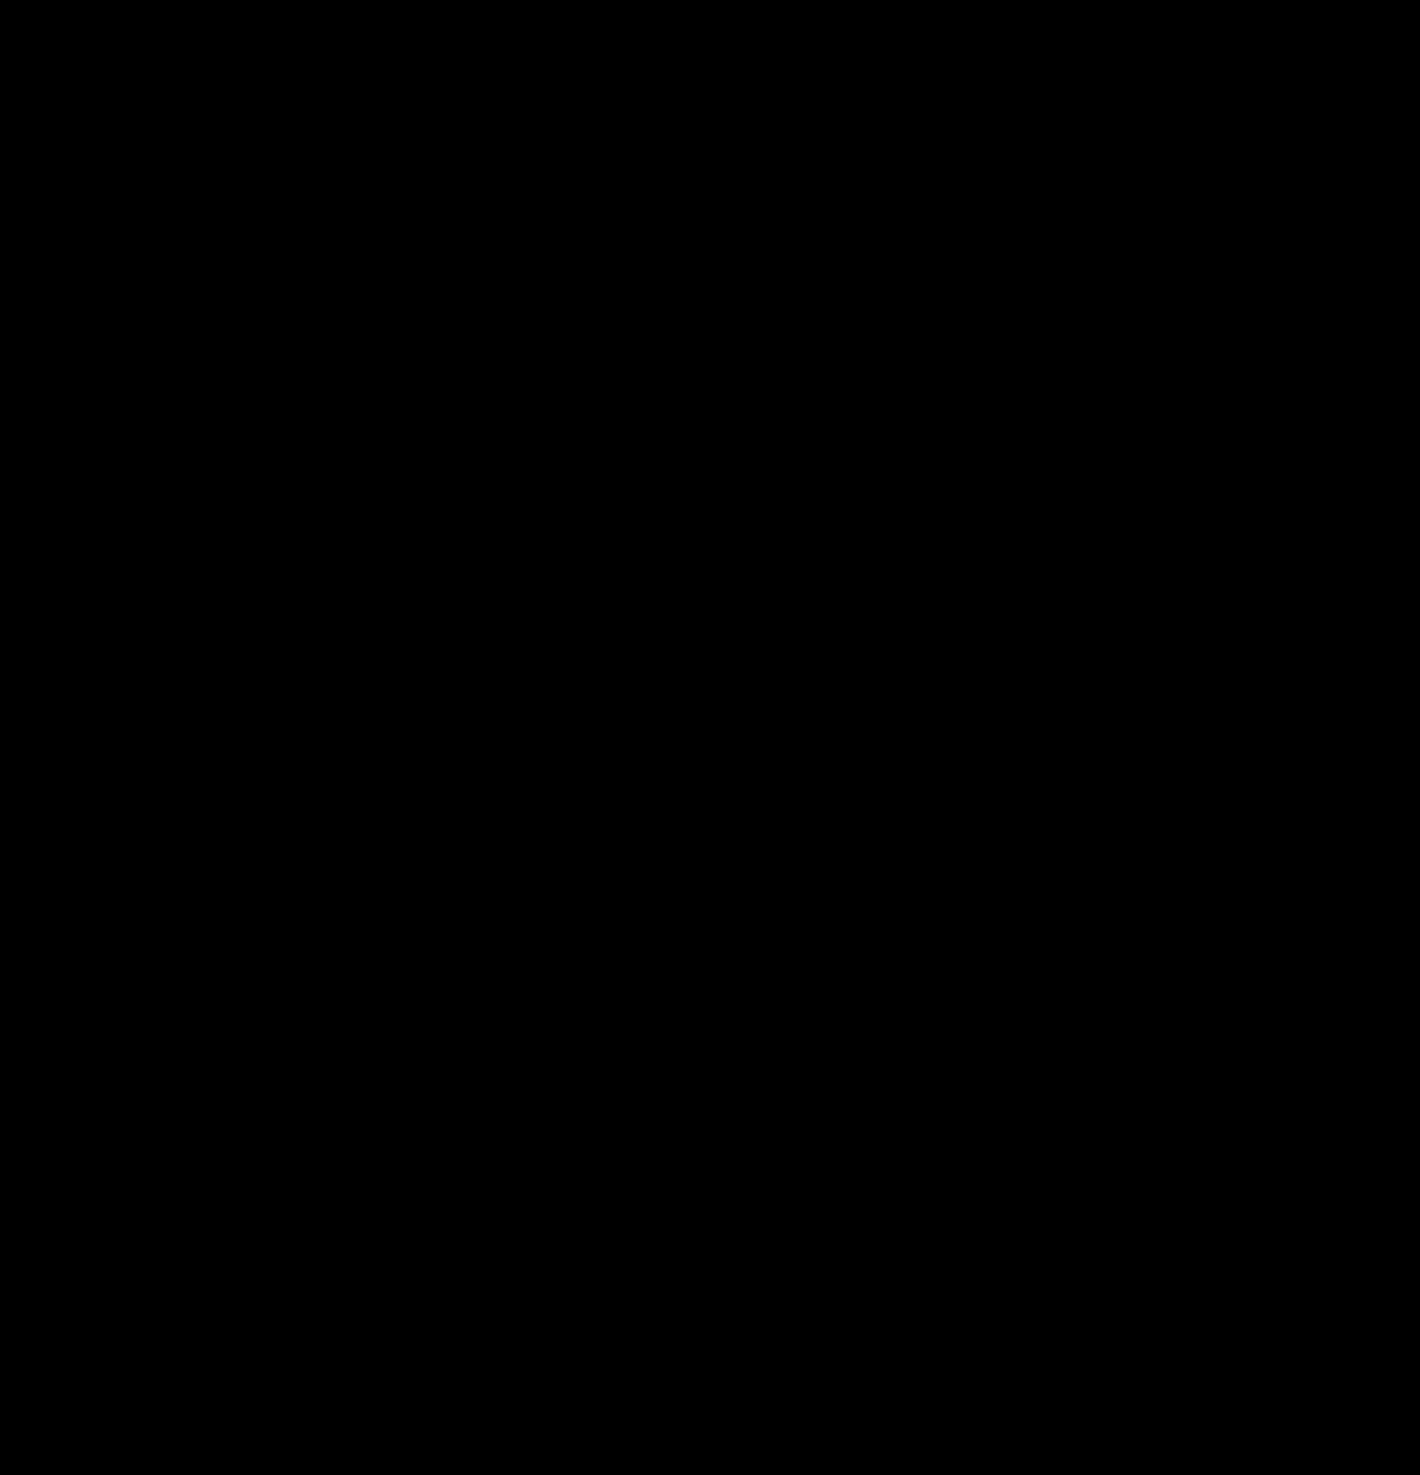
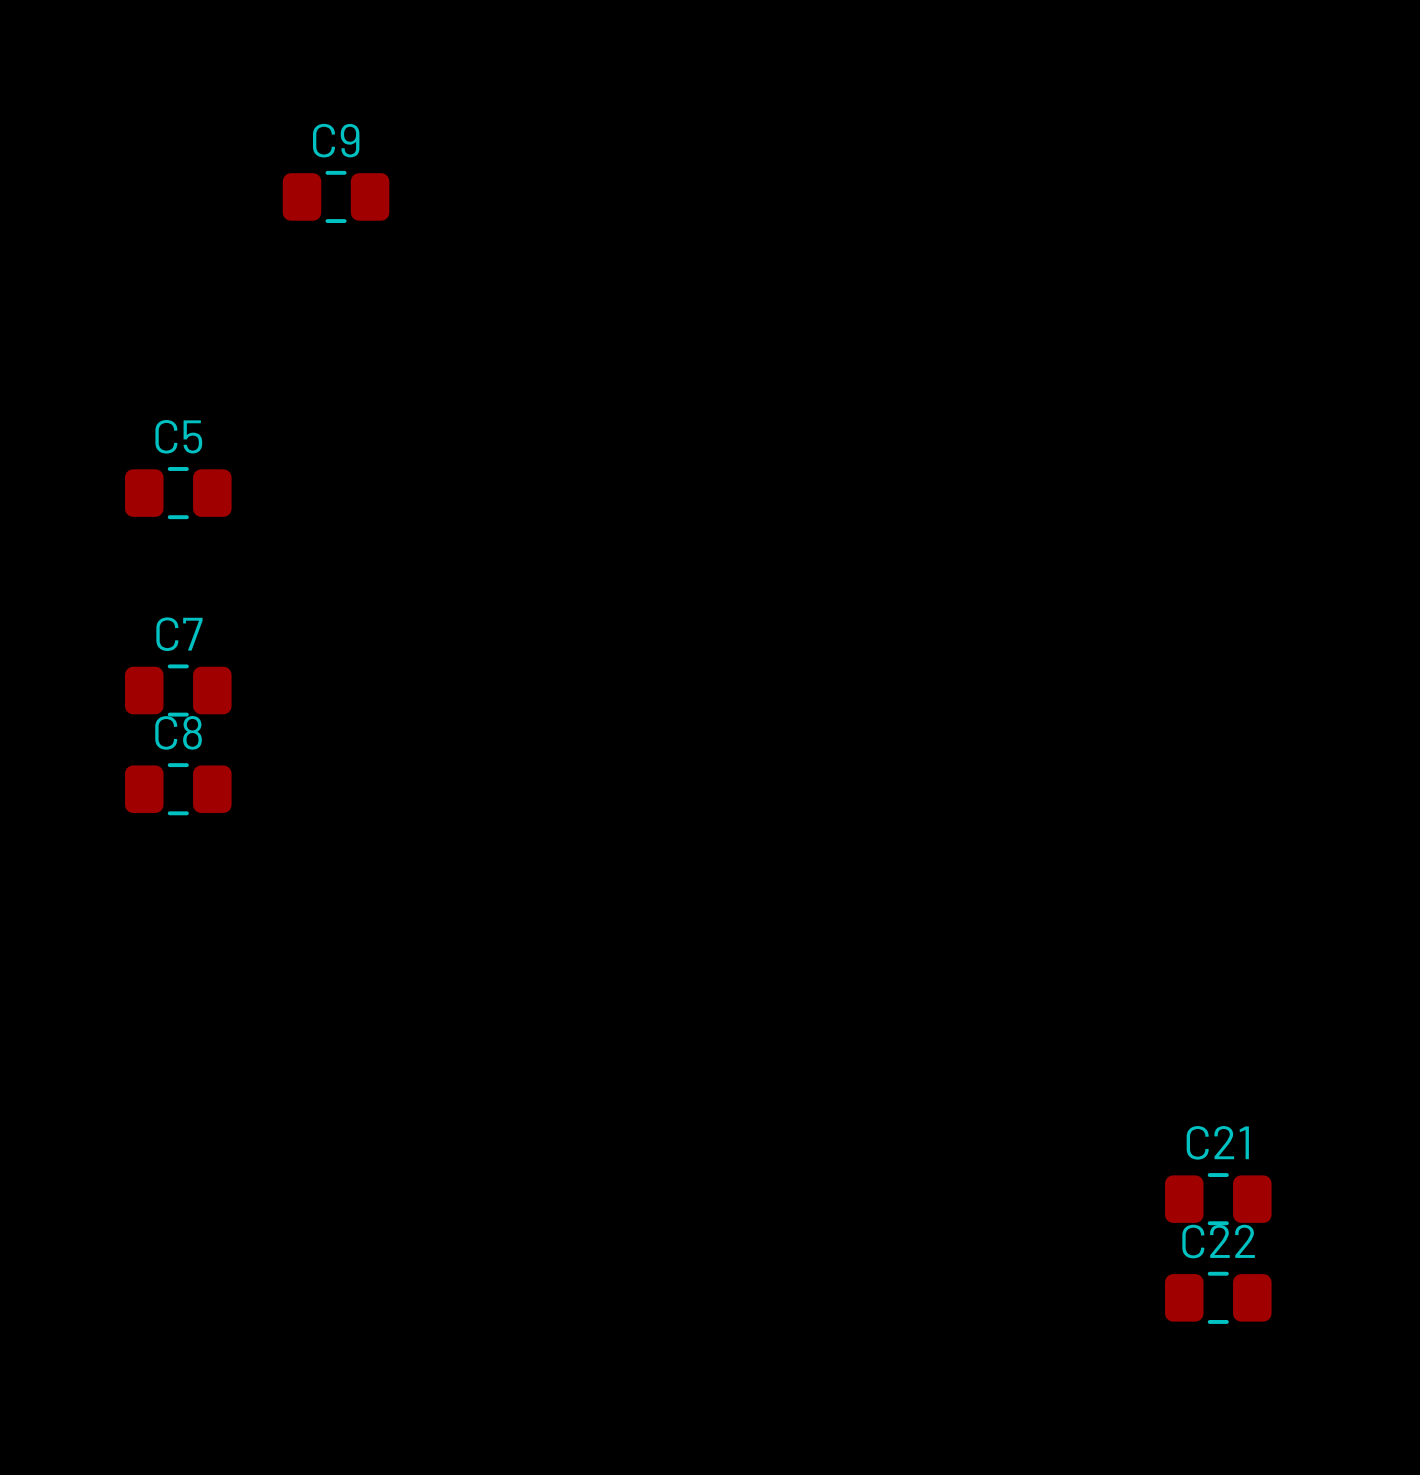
C9: none -> (336, 196)
C5: none -> (178, 493)
C7: none -> (178, 690)
C8: none -> (178, 789)
C21: none -> (1218, 1199)
C22: none -> (1218, 1297)

